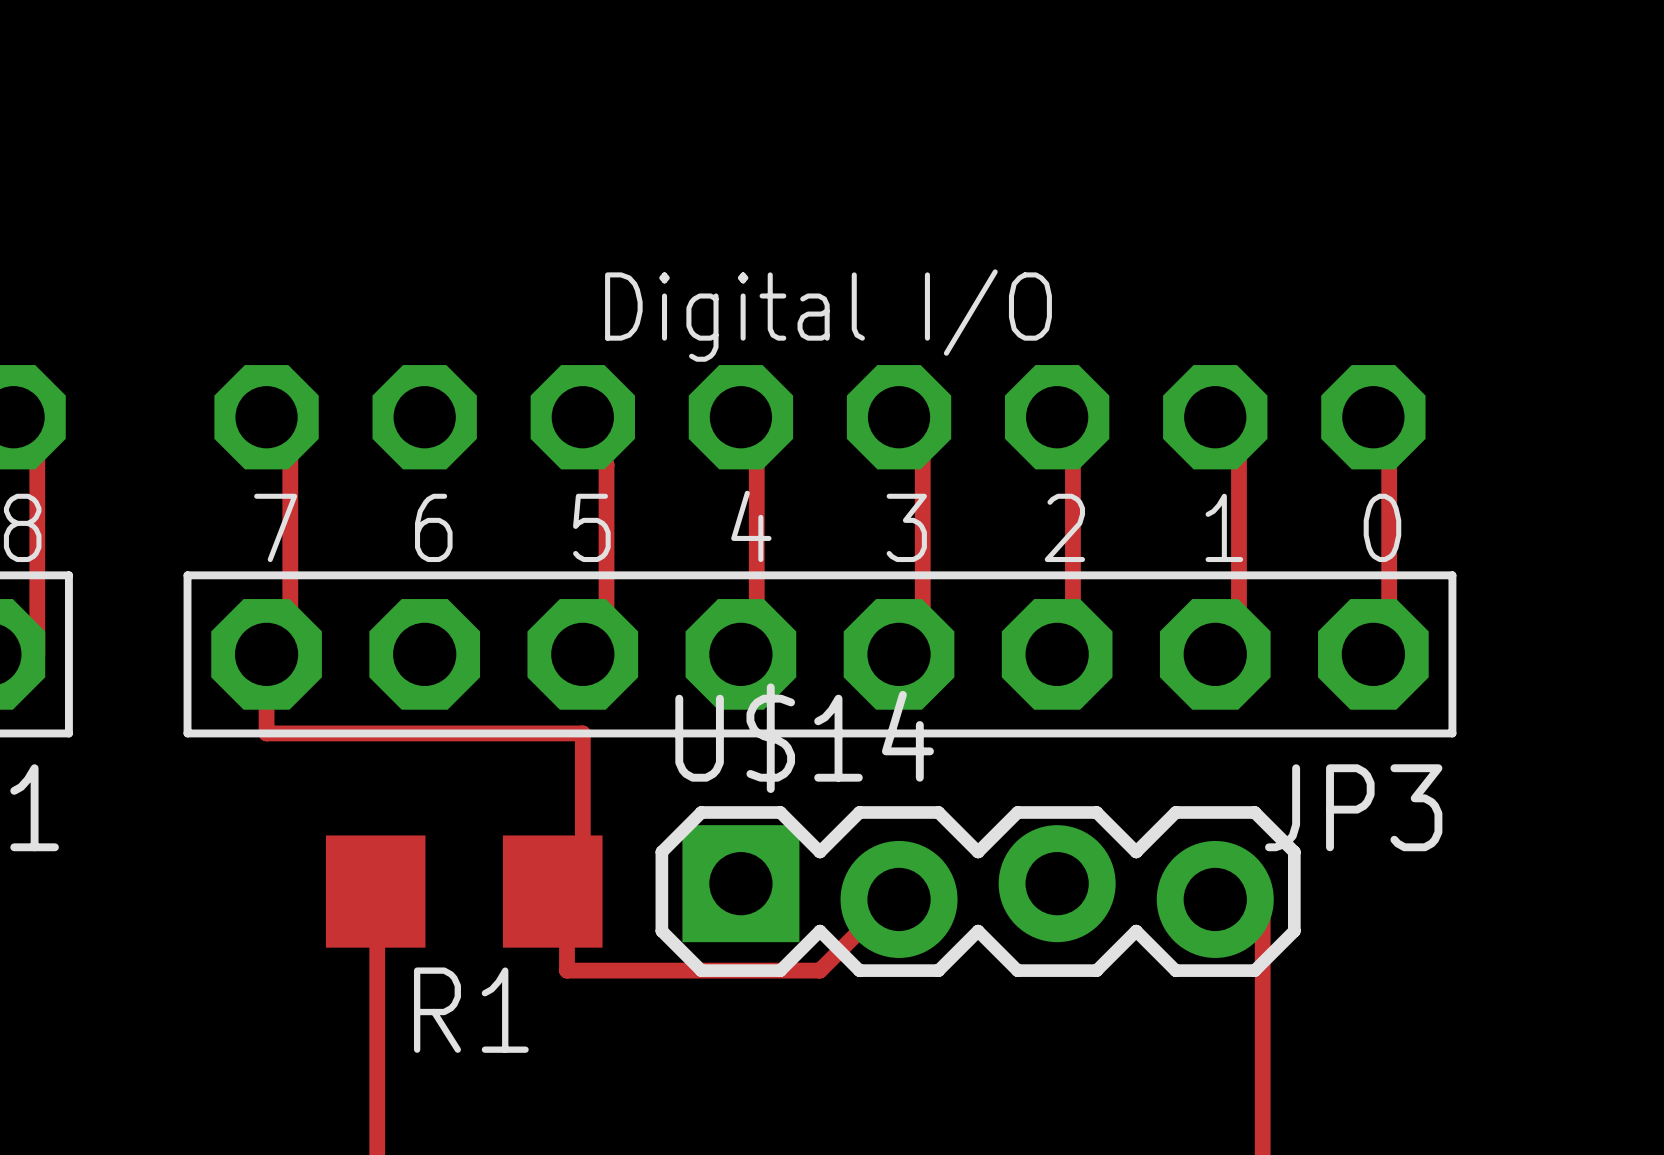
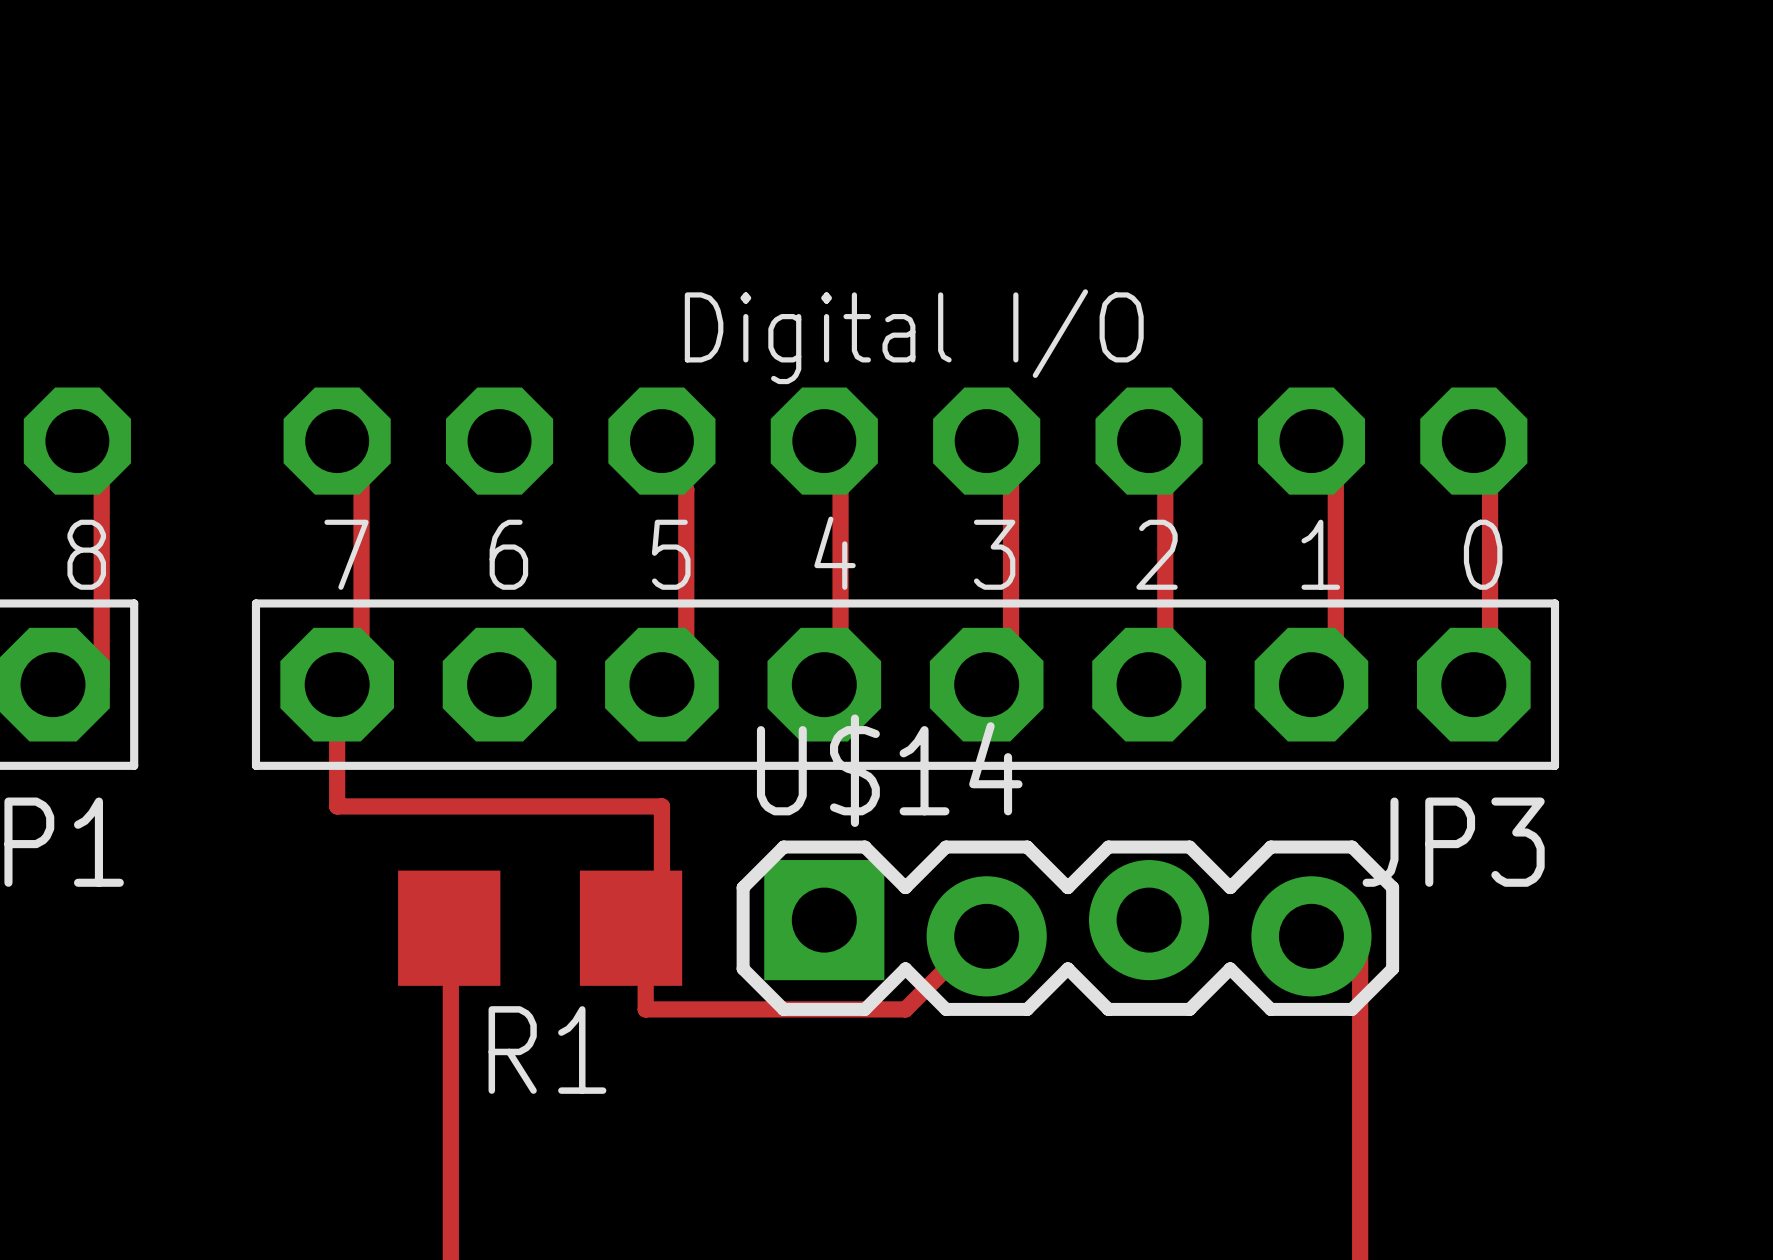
track: (266, 733) (582, 733) (582, 772) -> (337, 765) (337, 806) (661, 806)

